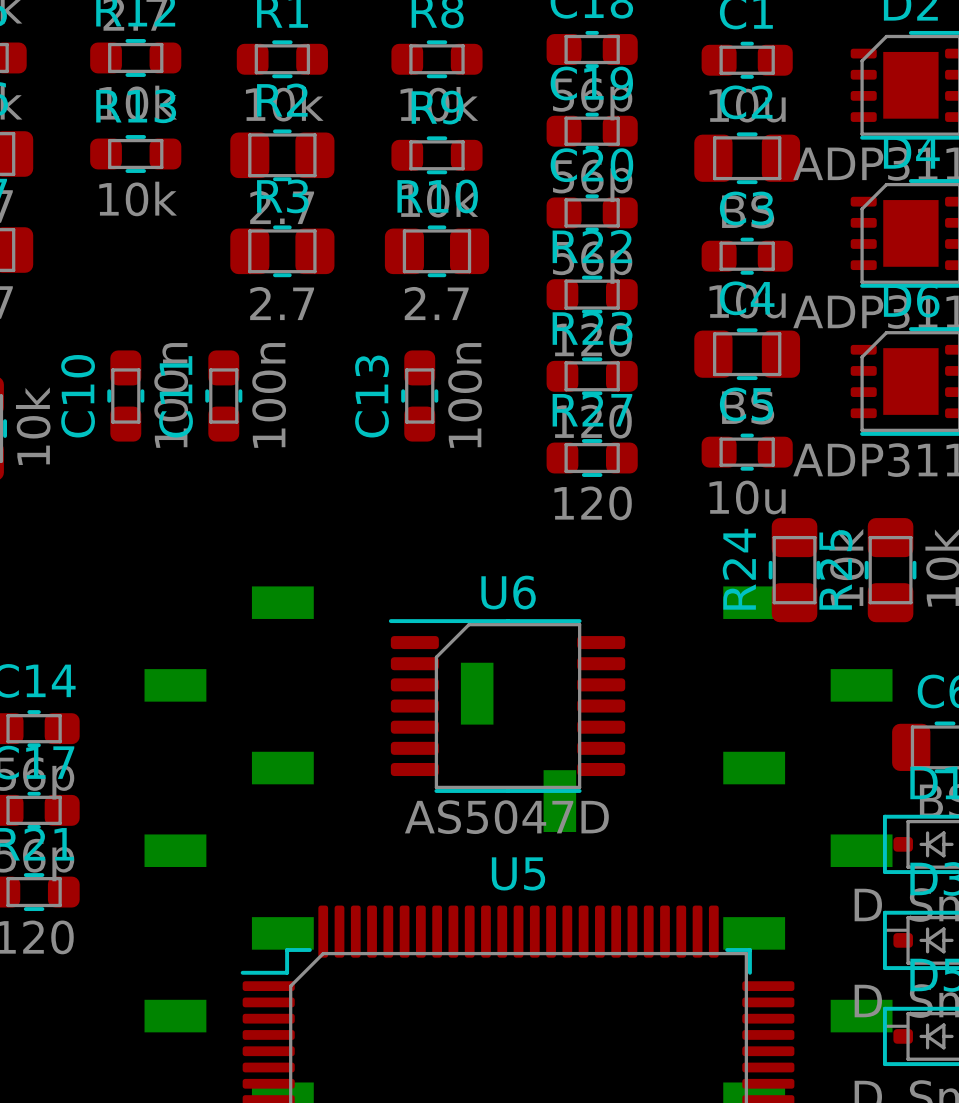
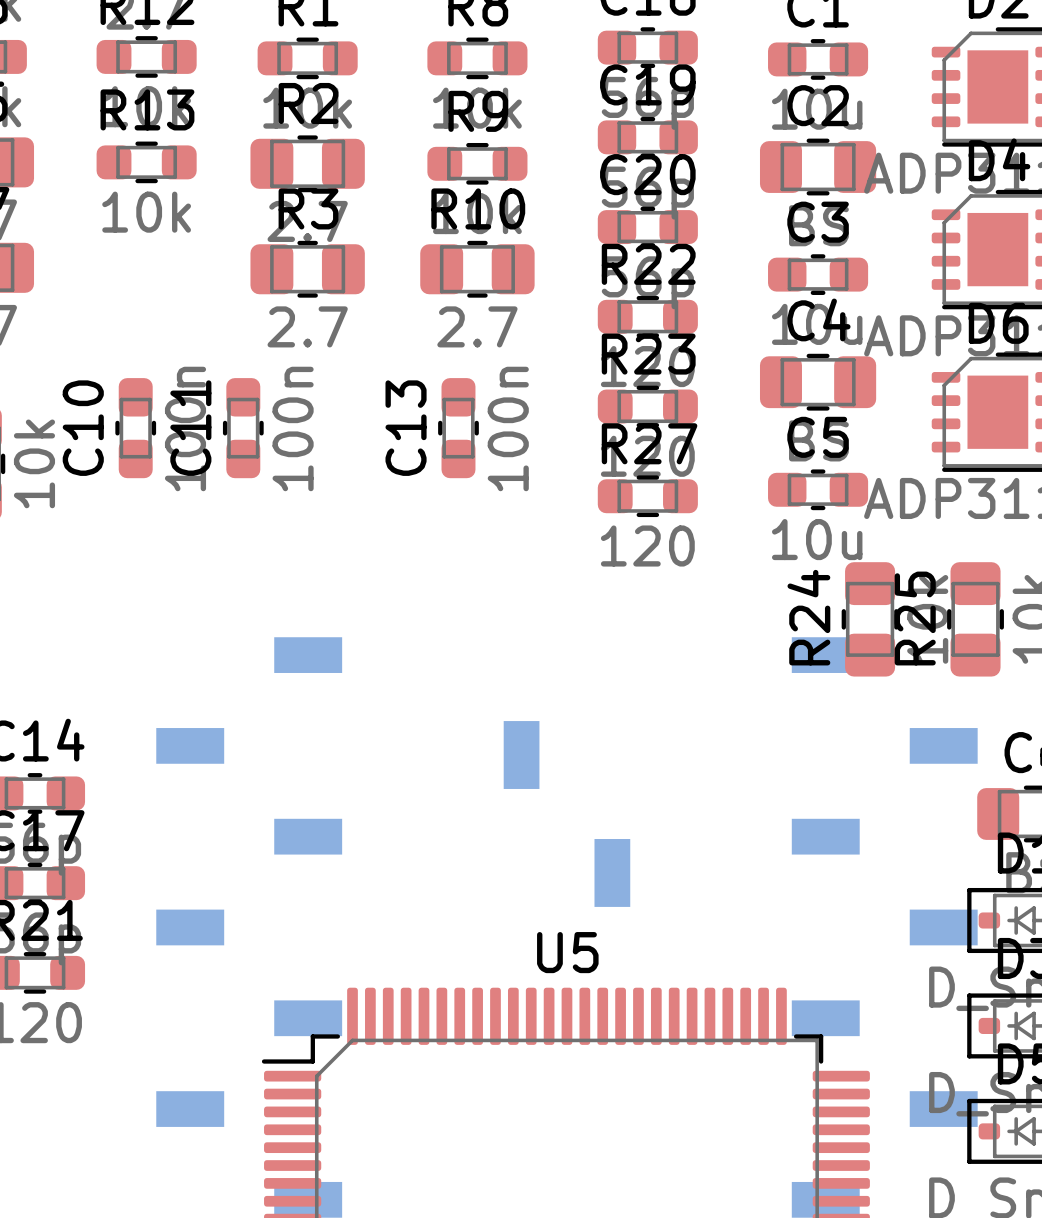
U6: AS5047D (507, 706) -> none

